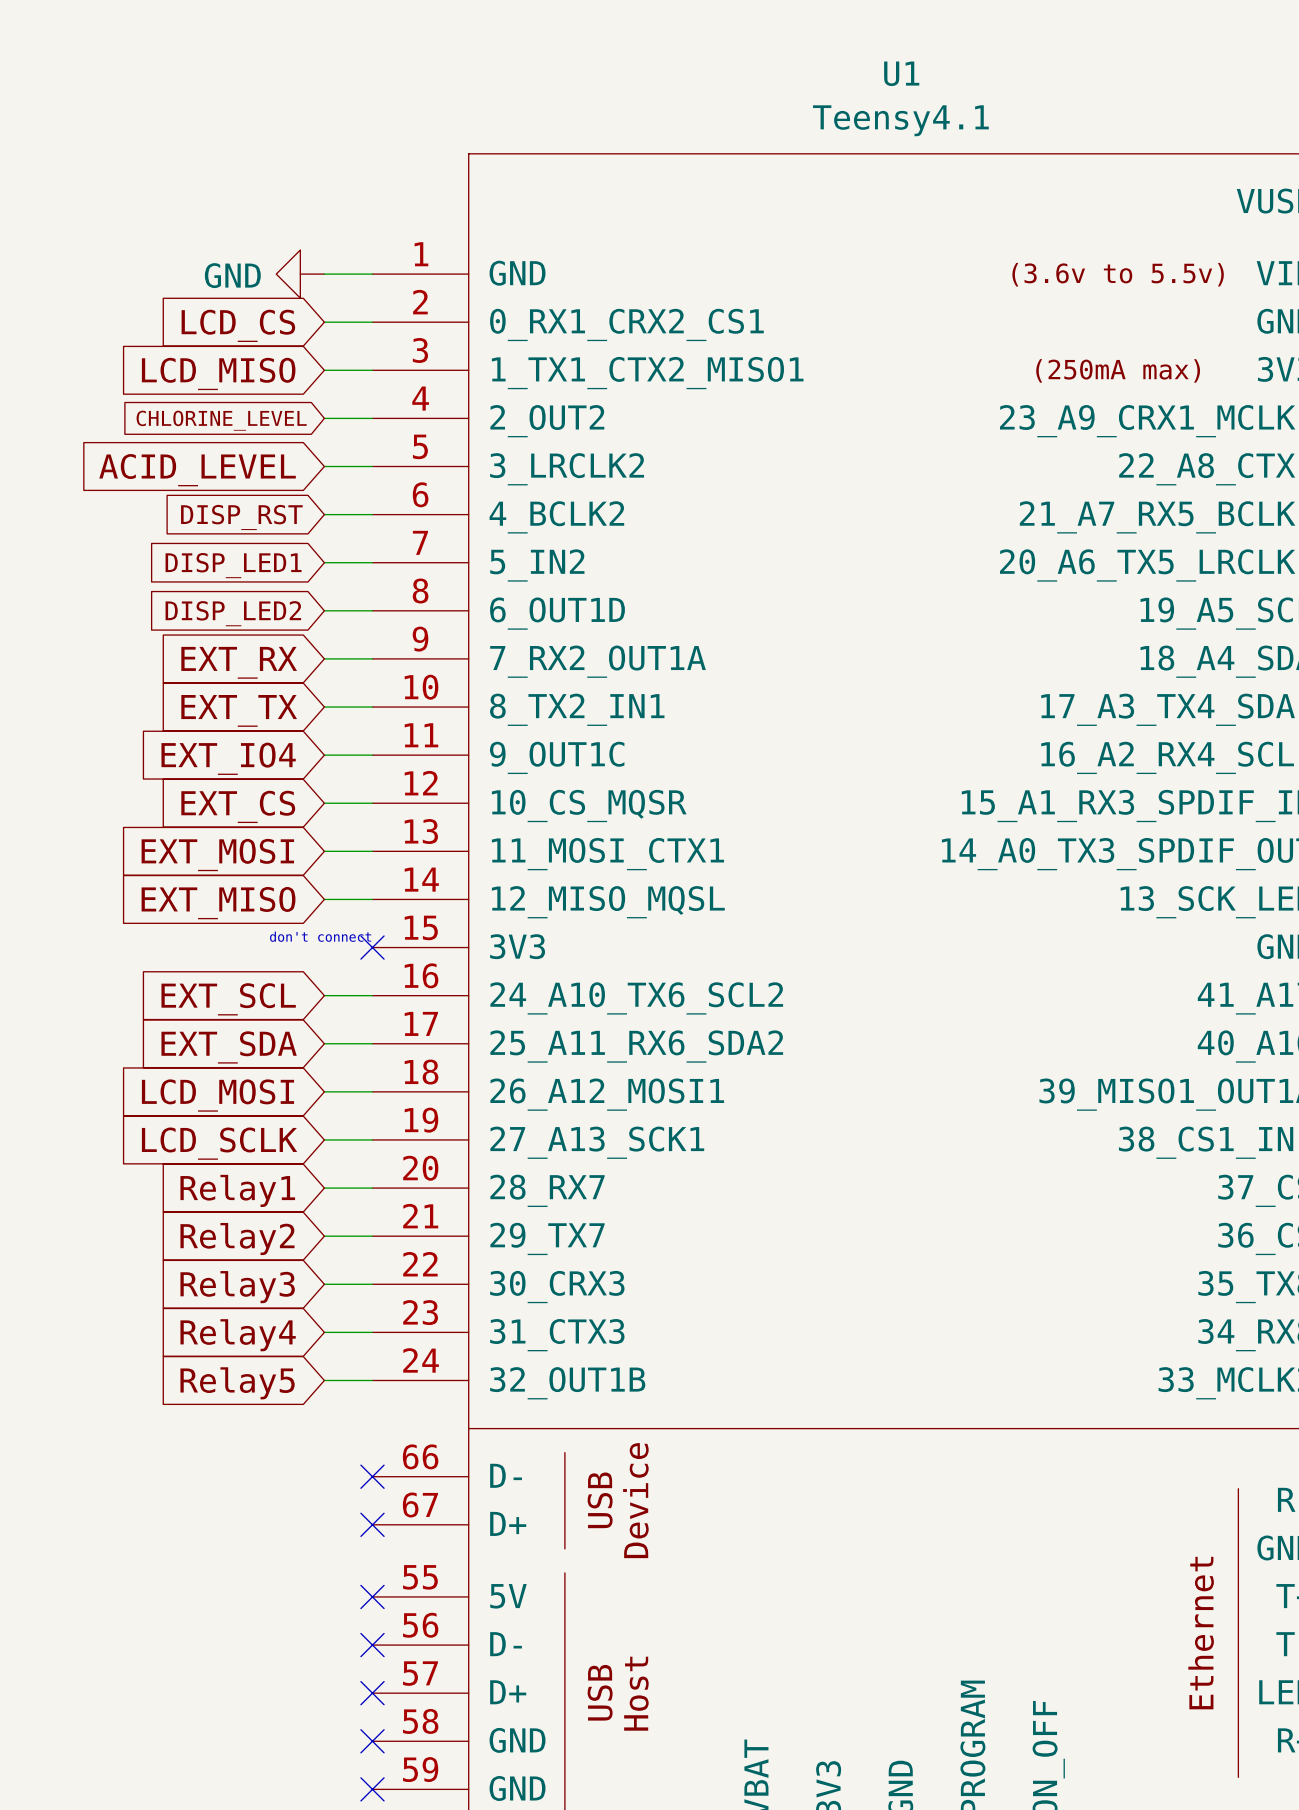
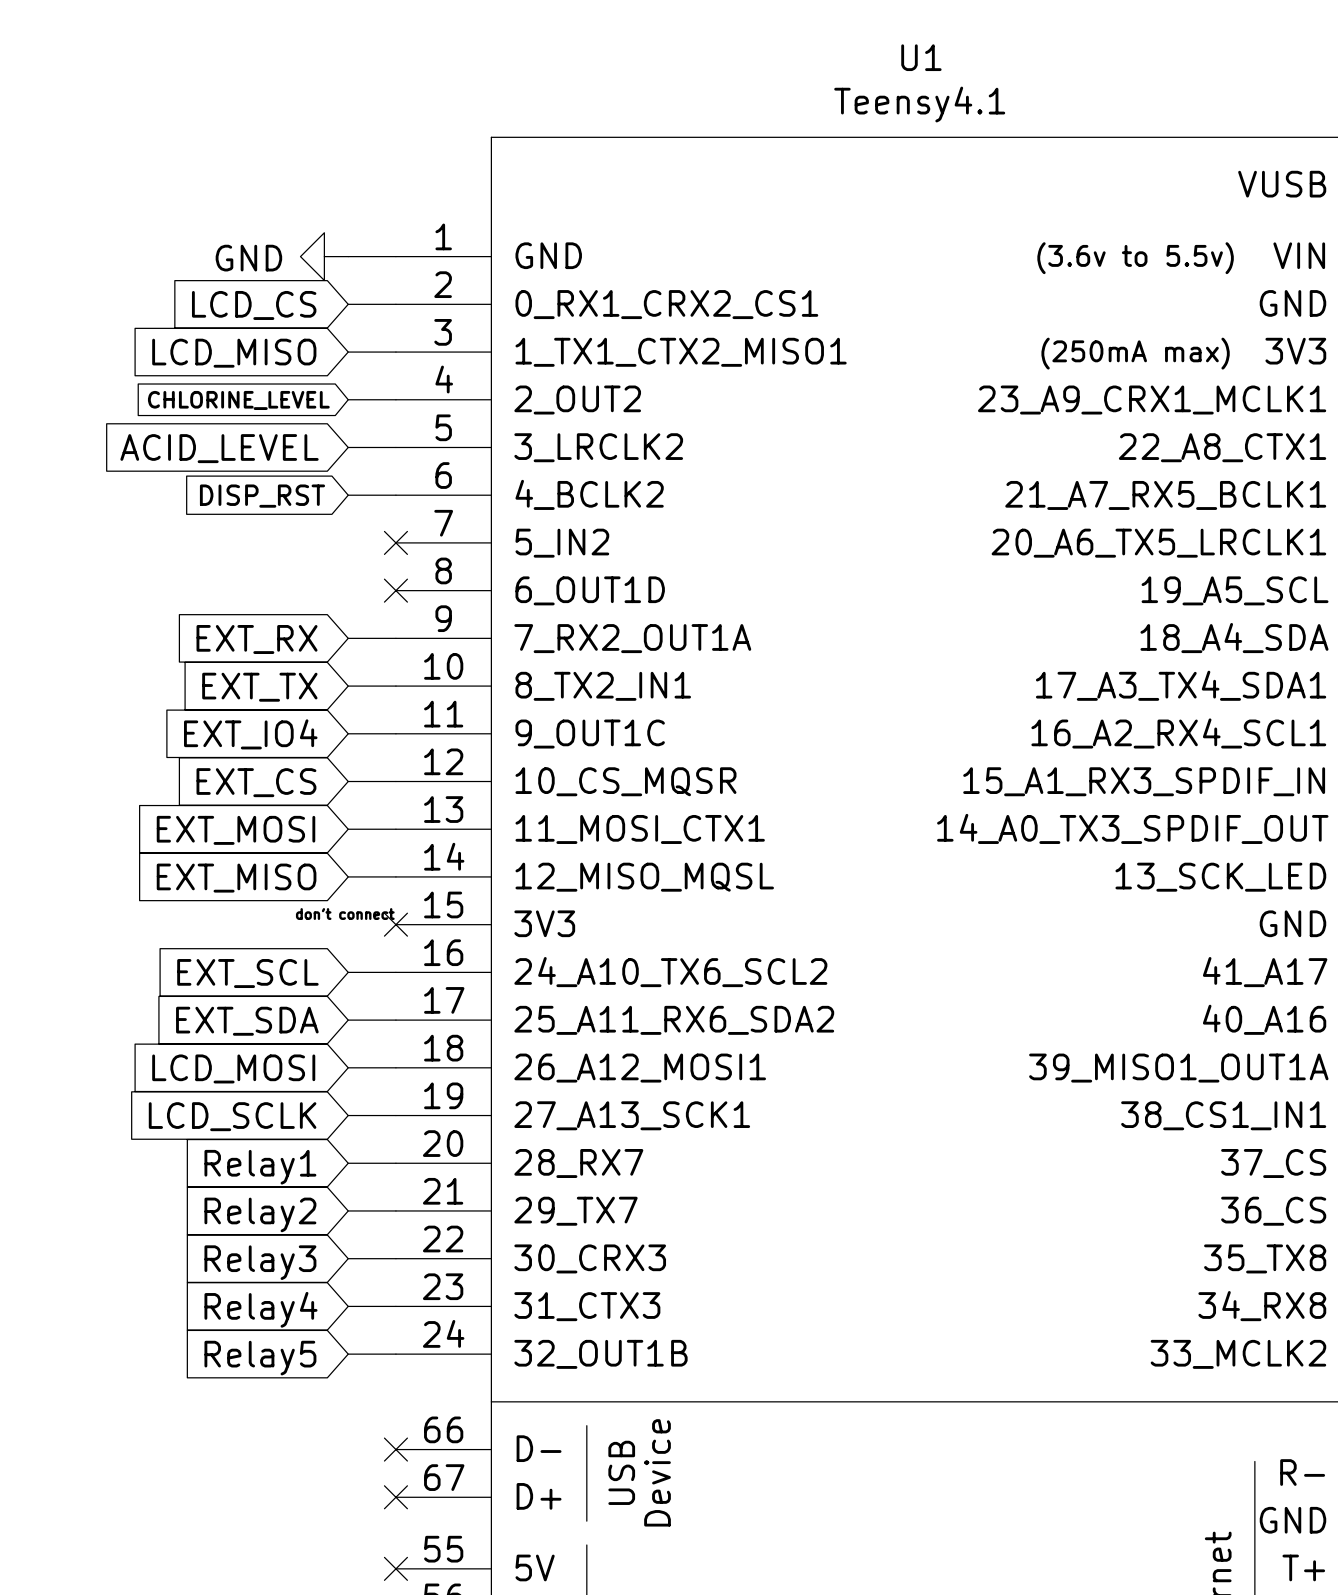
wire: (324, 562) (372, 562) -> none
no-connect mark: none -> (395, 542)
global label: DISP_LED1 (233, 565) -> none
wire: (324, 610) (372, 610) -> none
no-connect mark: none -> (395, 590)
global label: DISP_LED2 (233, 613) -> none

